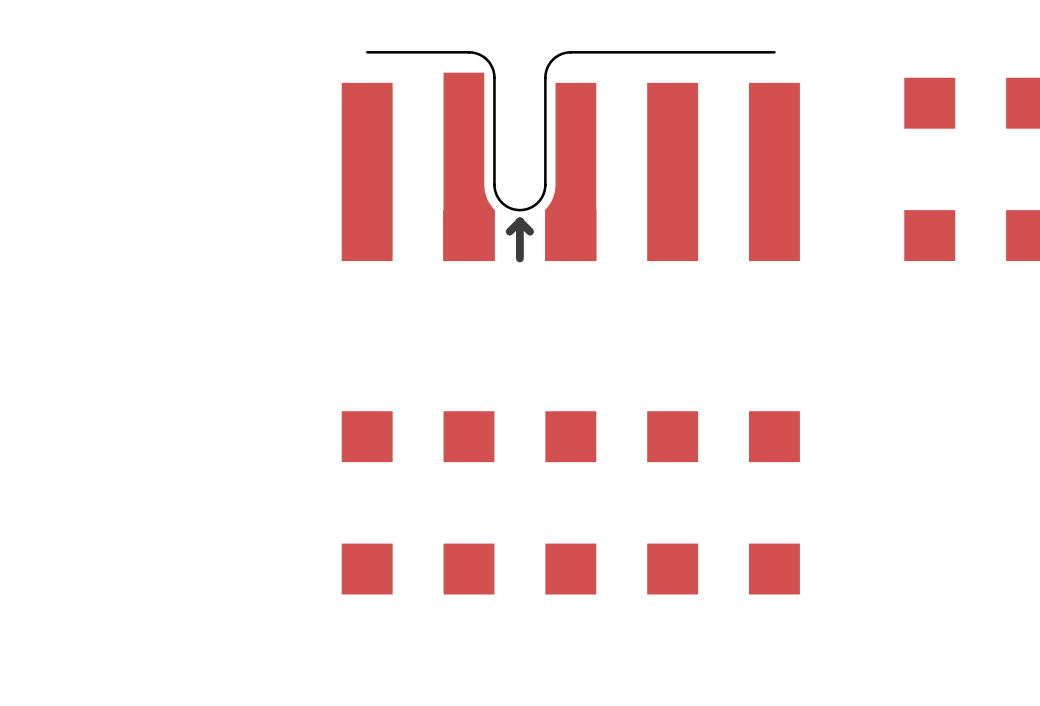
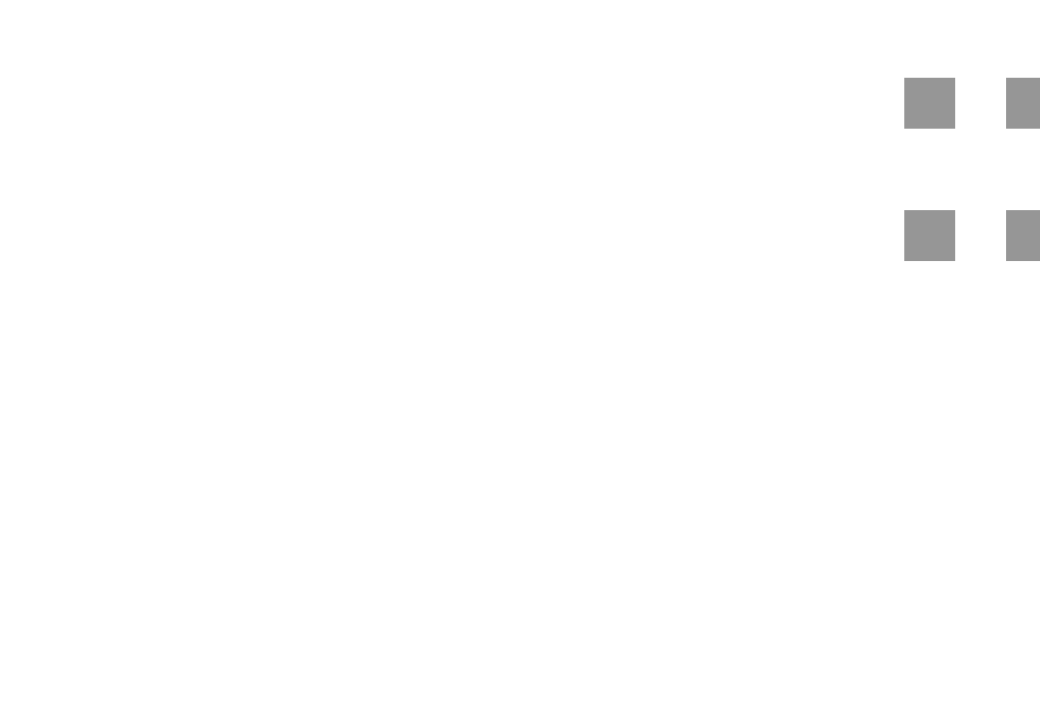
part: (570, 156) -> none
part: (570, 502) -> none

